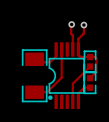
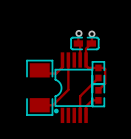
part: none -> (84, 43)

